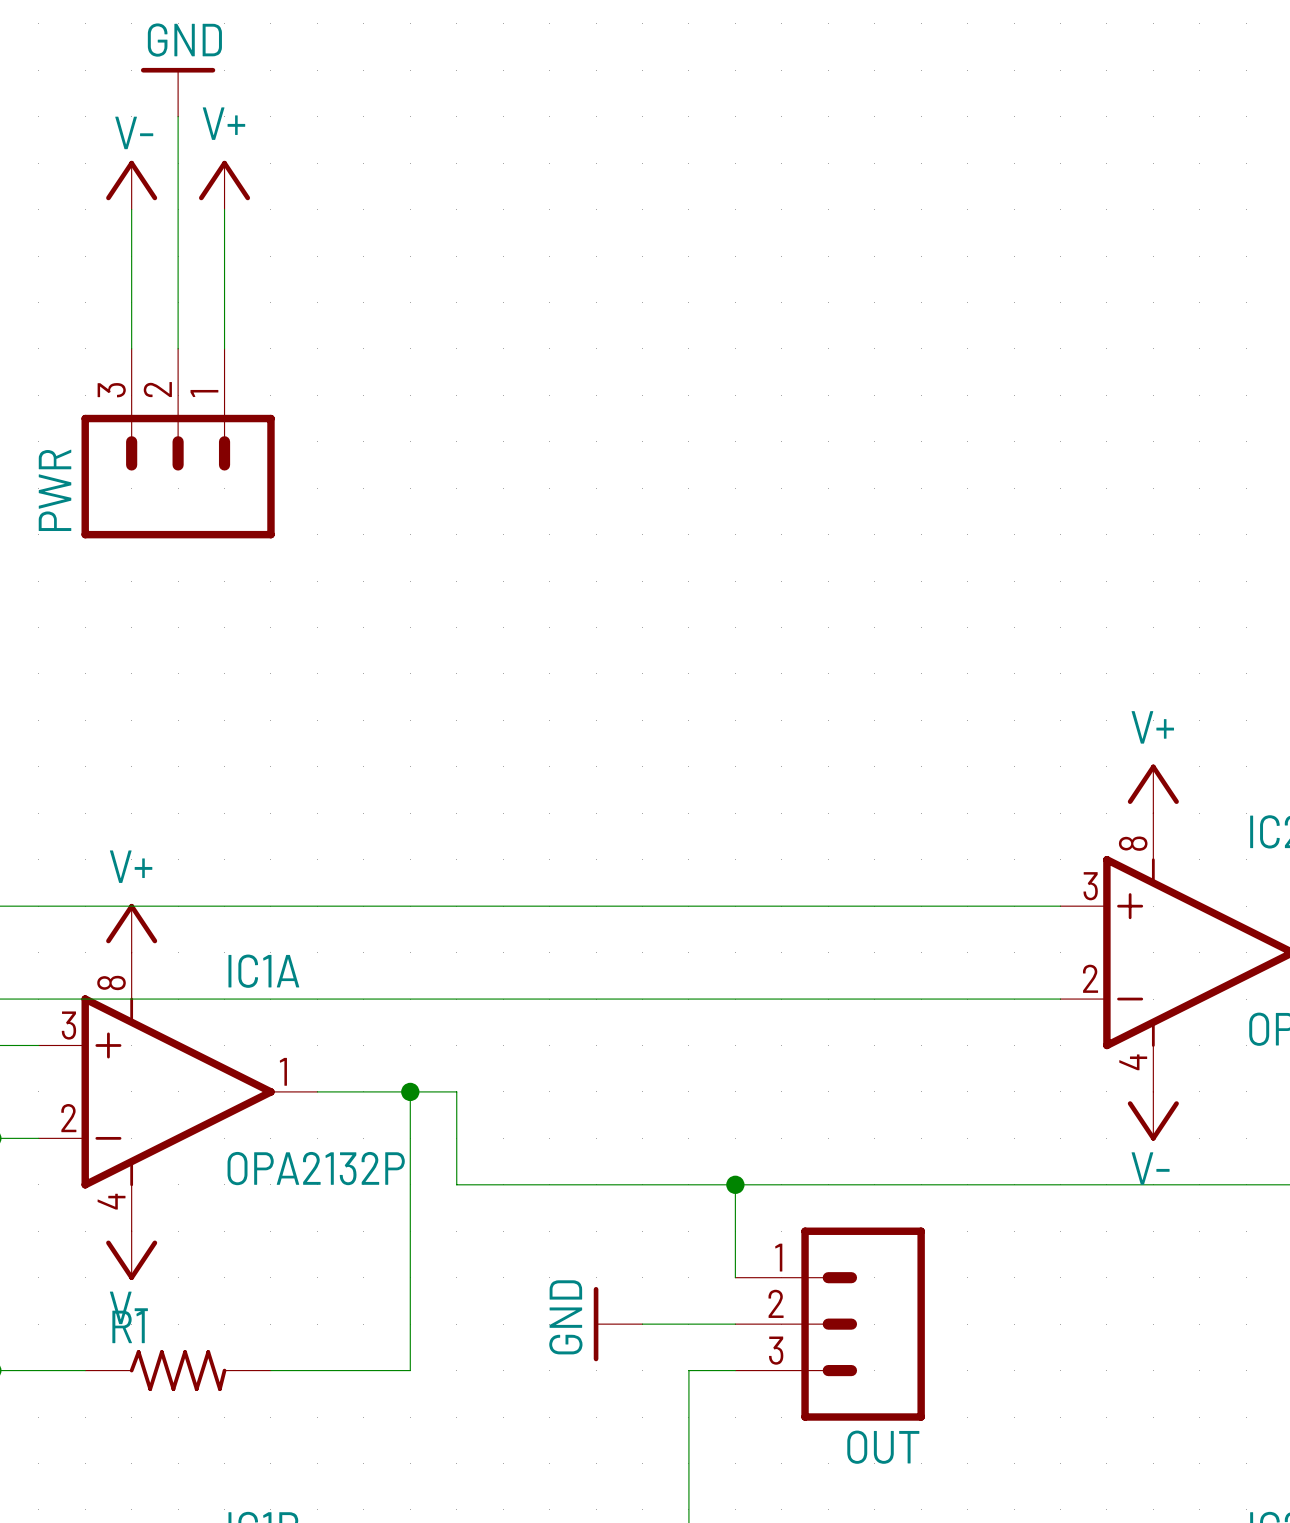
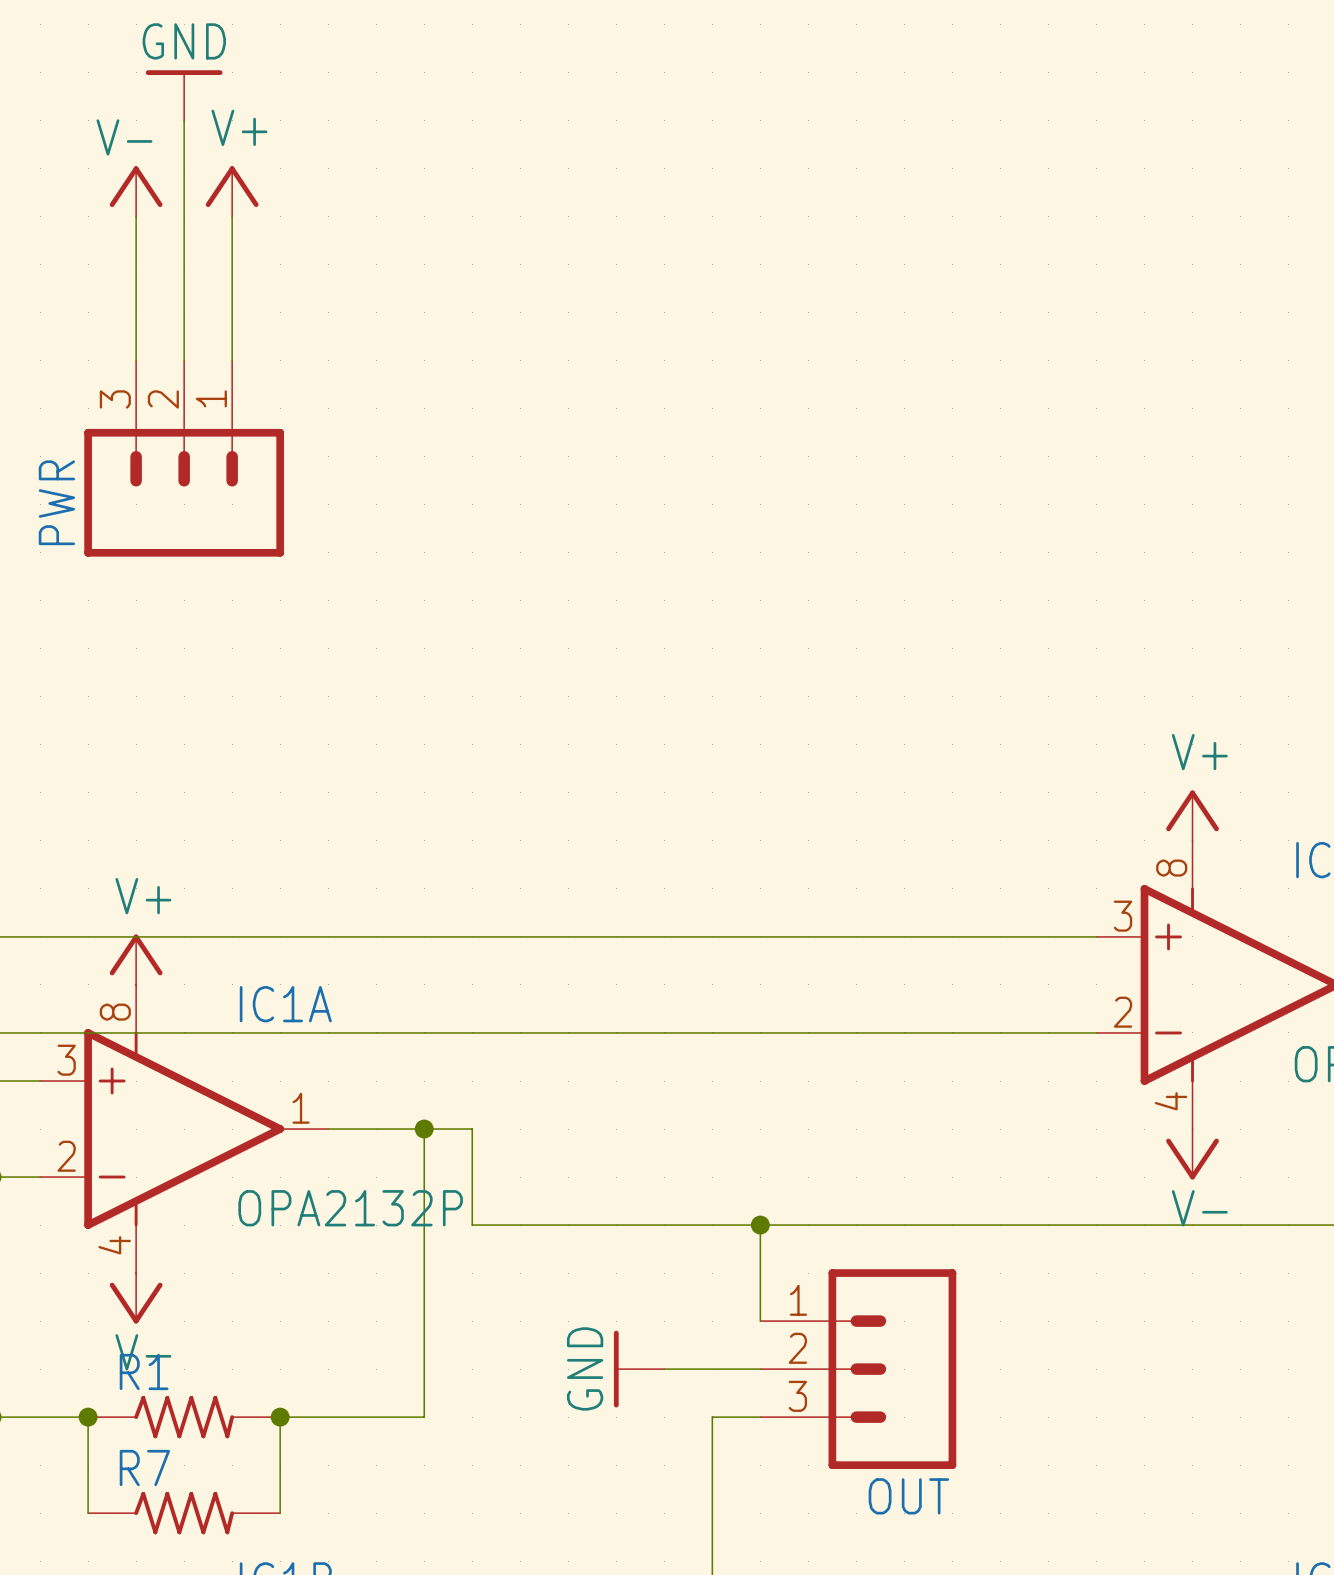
wire: none -> (88, 1417) (88, 1513)
junction: none -> (88, 1417)
wire: none -> (280, 1417) (280, 1513)
junction: none -> (280, 1417)
R7: none -> (184, 1513)

